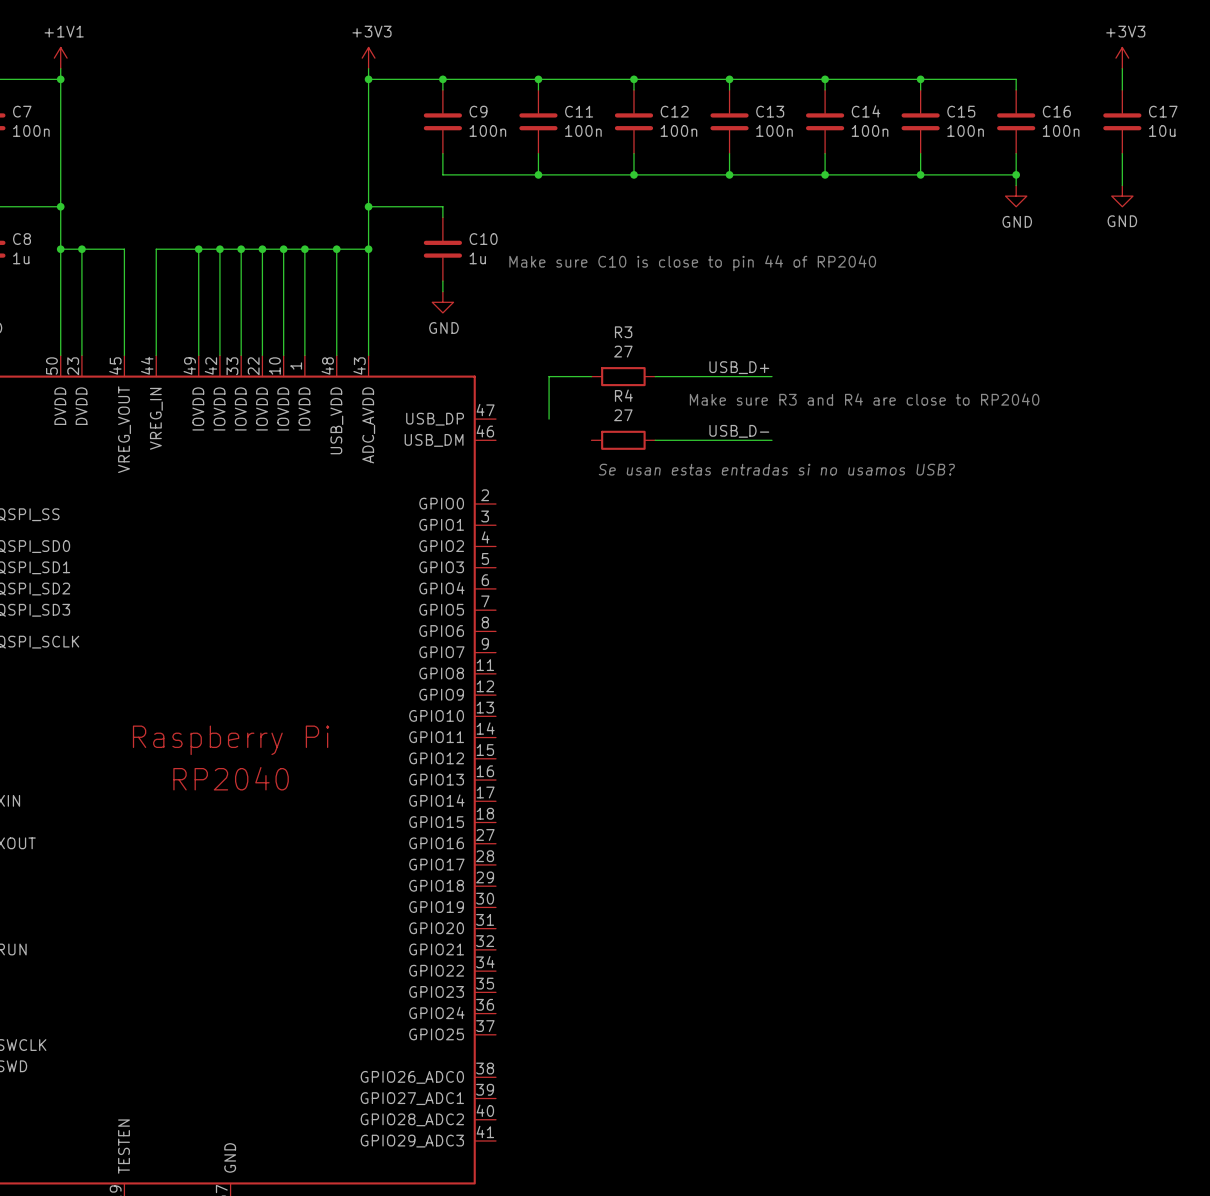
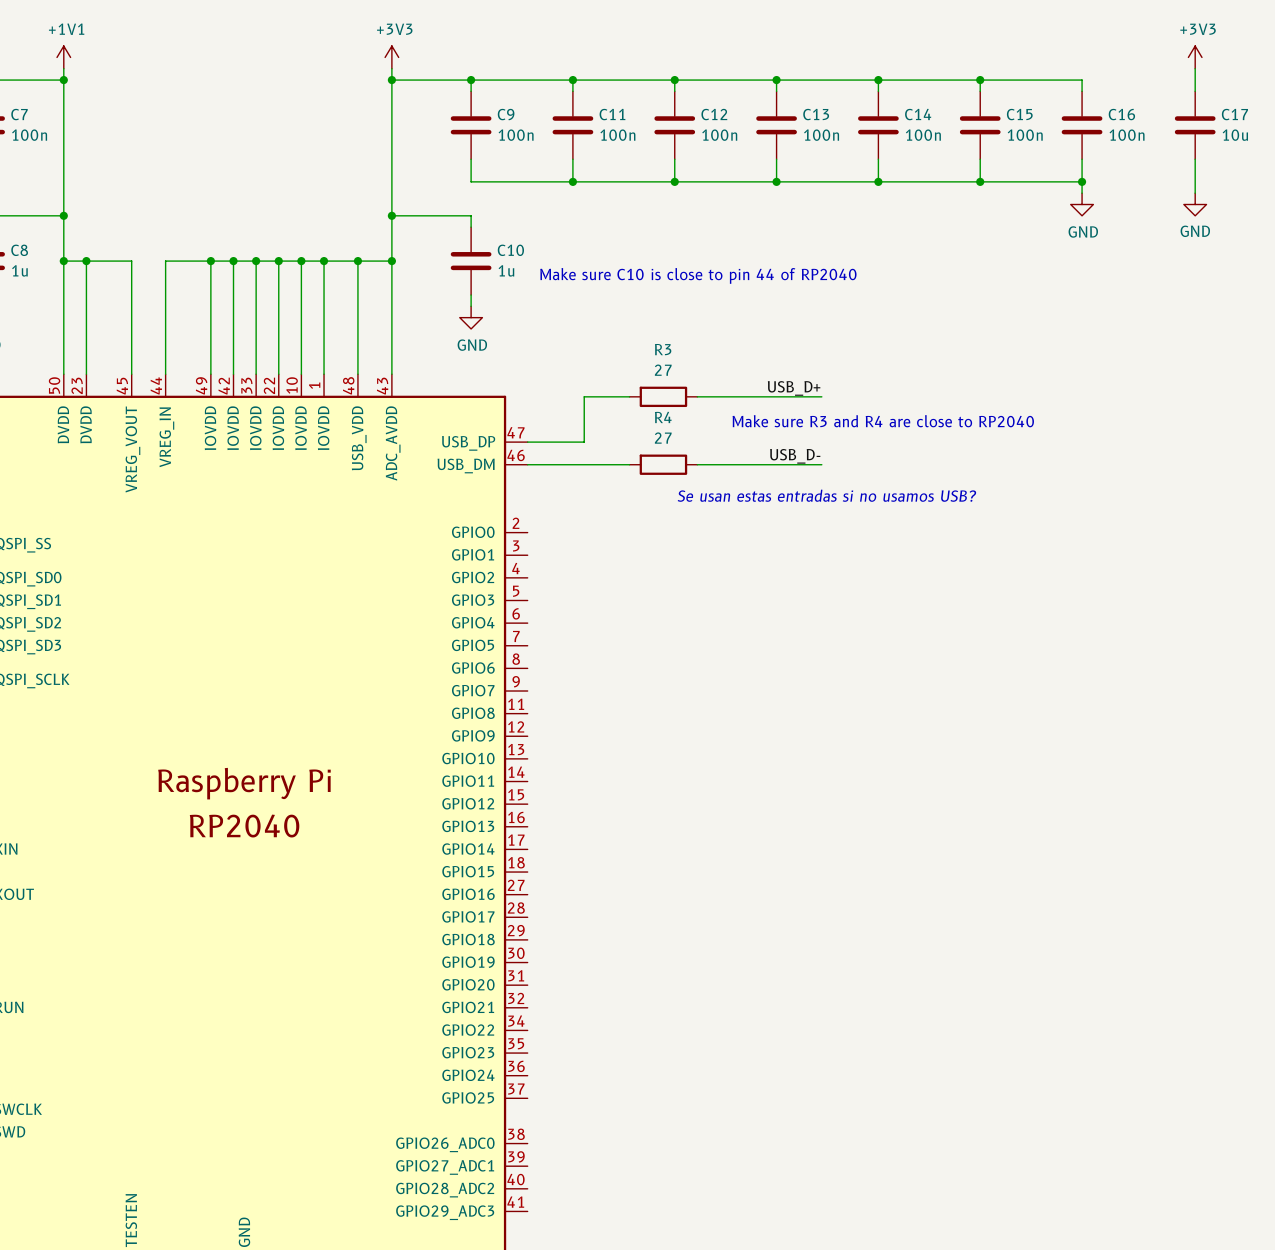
wire: none -> (527, 442) (584, 442)
wire: none -> (527, 464) (629, 464)

